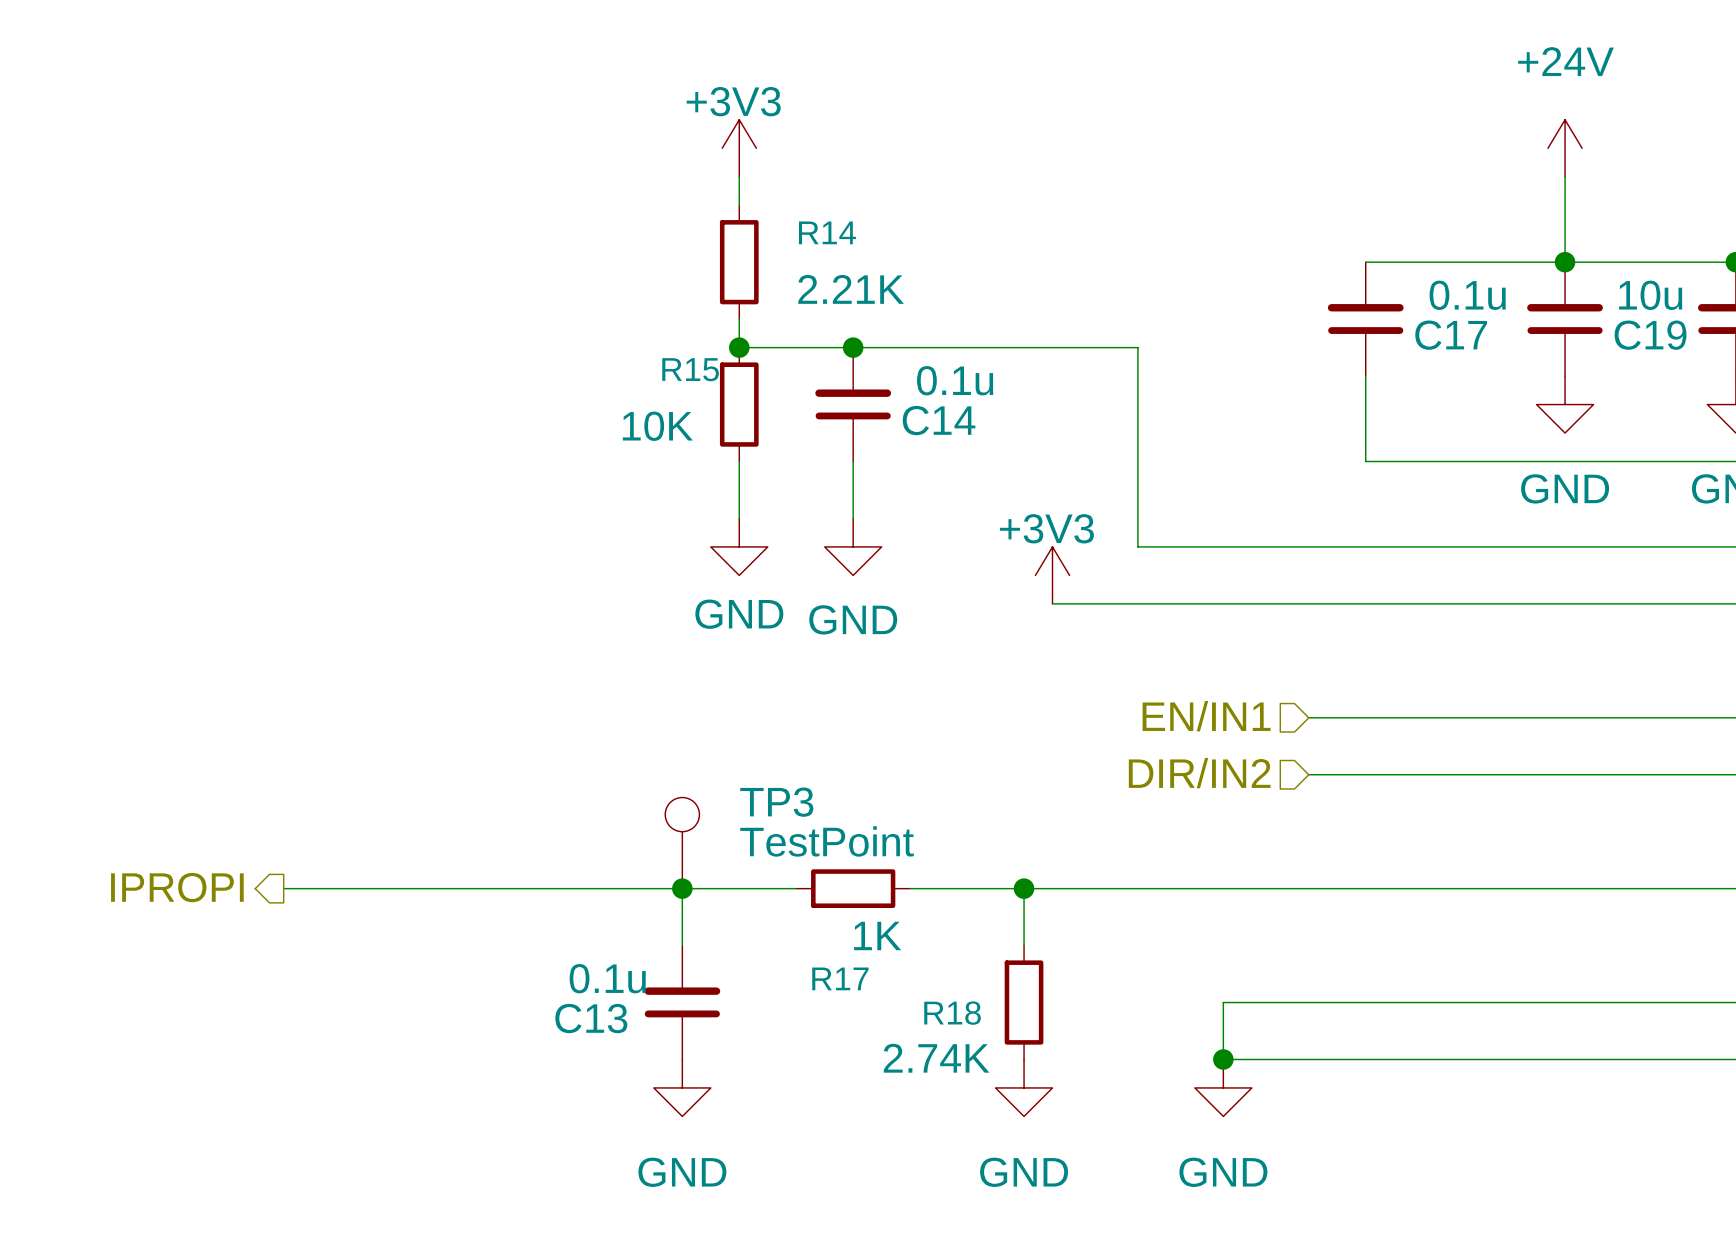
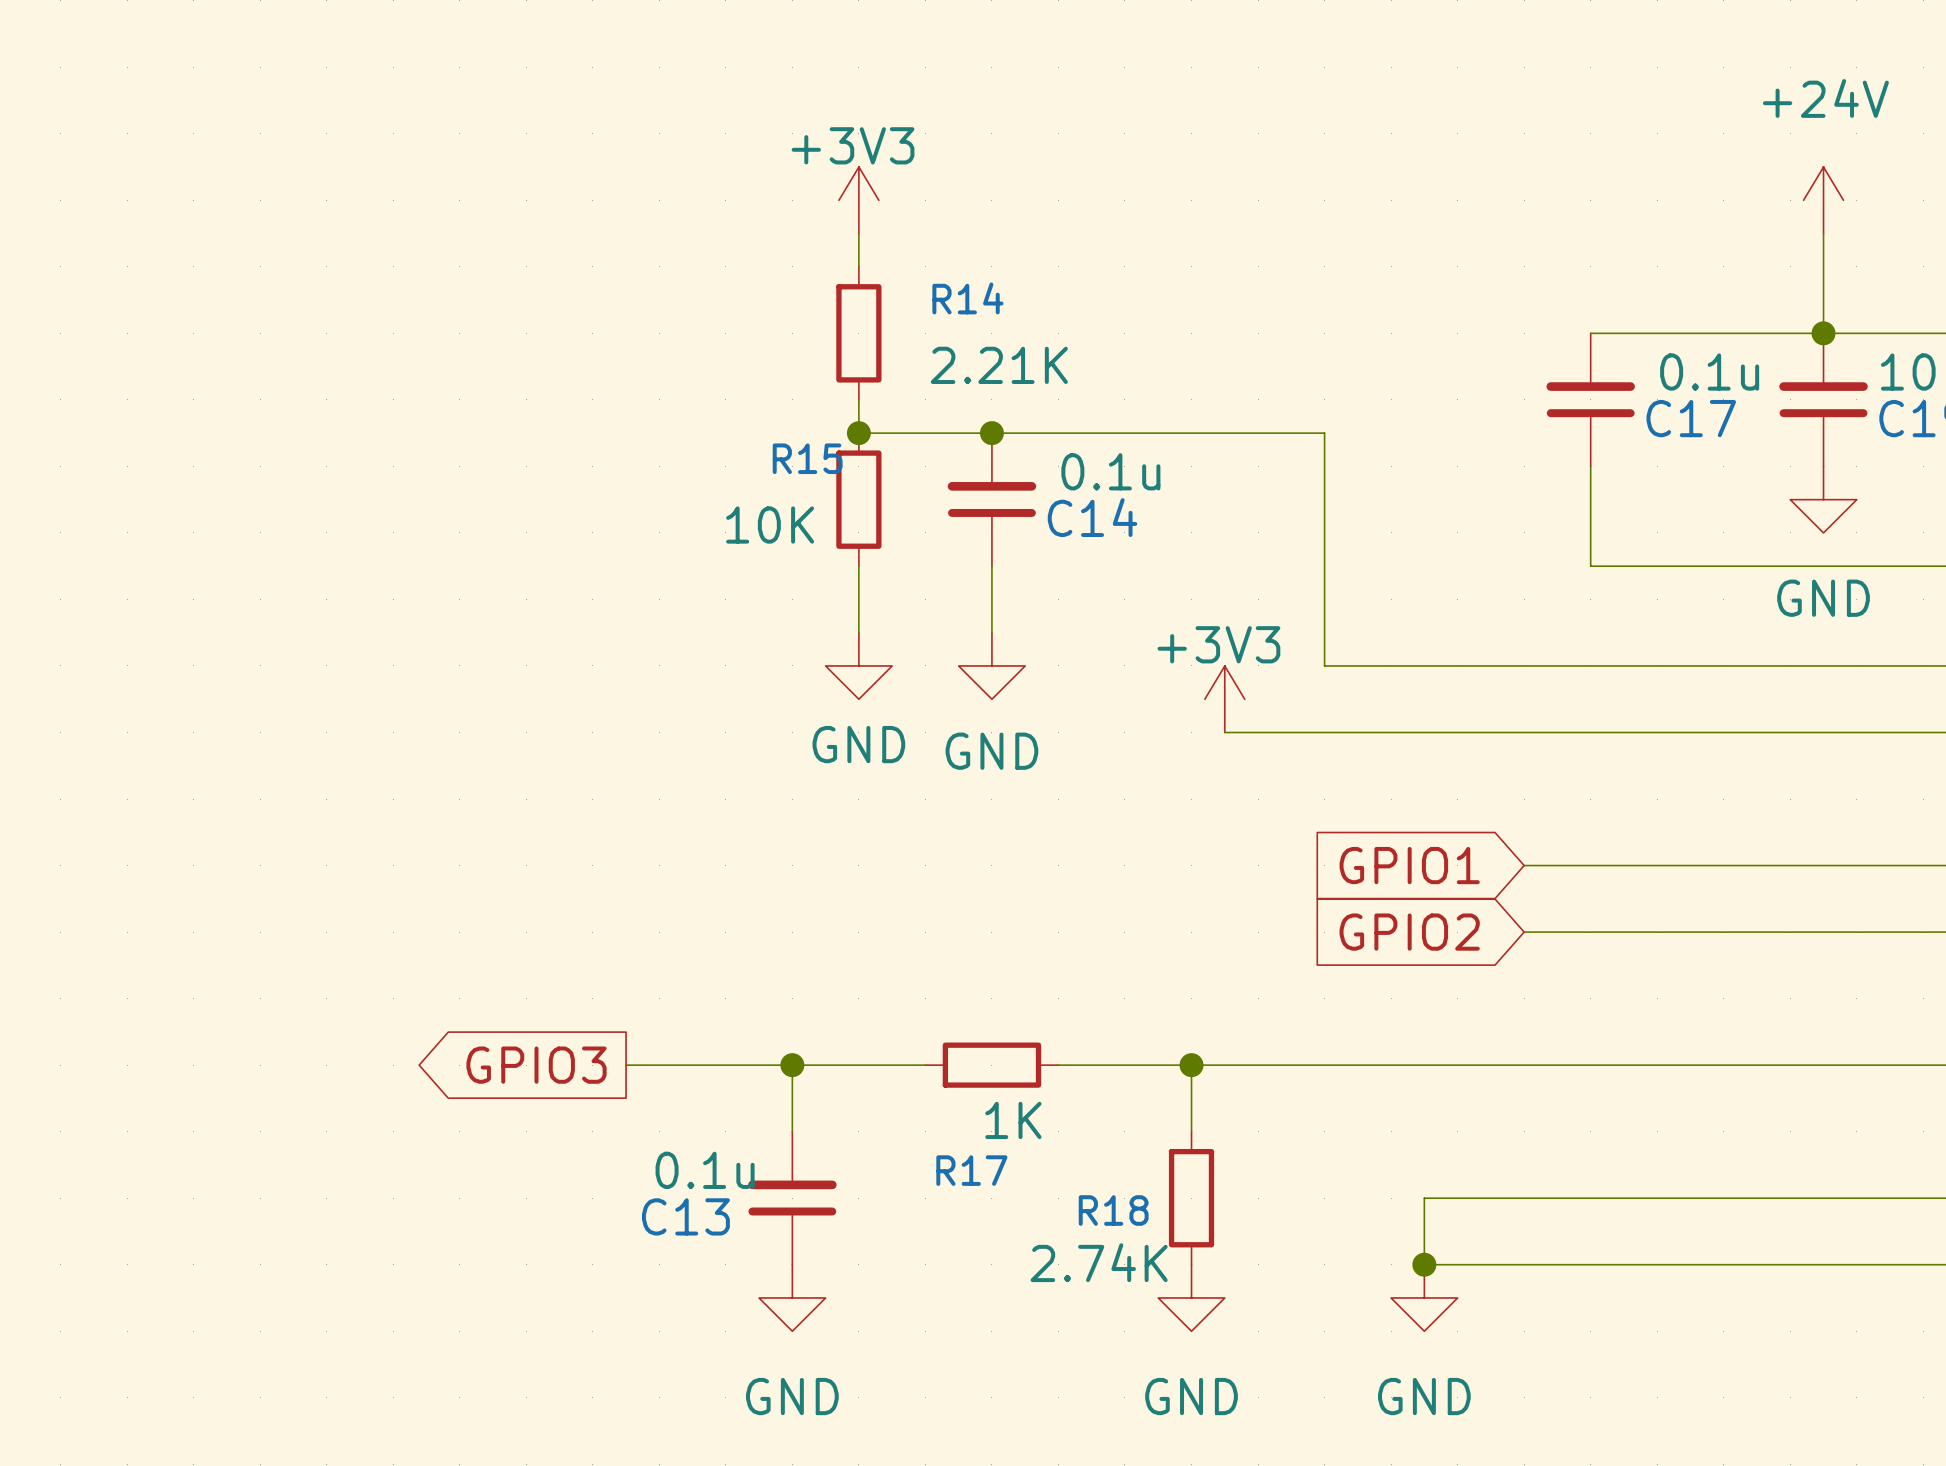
hierarchical label: EN/IN1 (1206, 716) -> none
global label: none -> GPIO1 (1409, 865)
hierarchical label: DIR/IN2 (1199, 773) -> none
global label: none -> GPIO2 (1409, 932)
TP3: TestPoint (682, 843) -> none
hierarchical label: IPROPI (177, 887) -> none
wire: (283, 888) (539, 888) -> none
global label: none -> GPIO3 (536, 1065)

